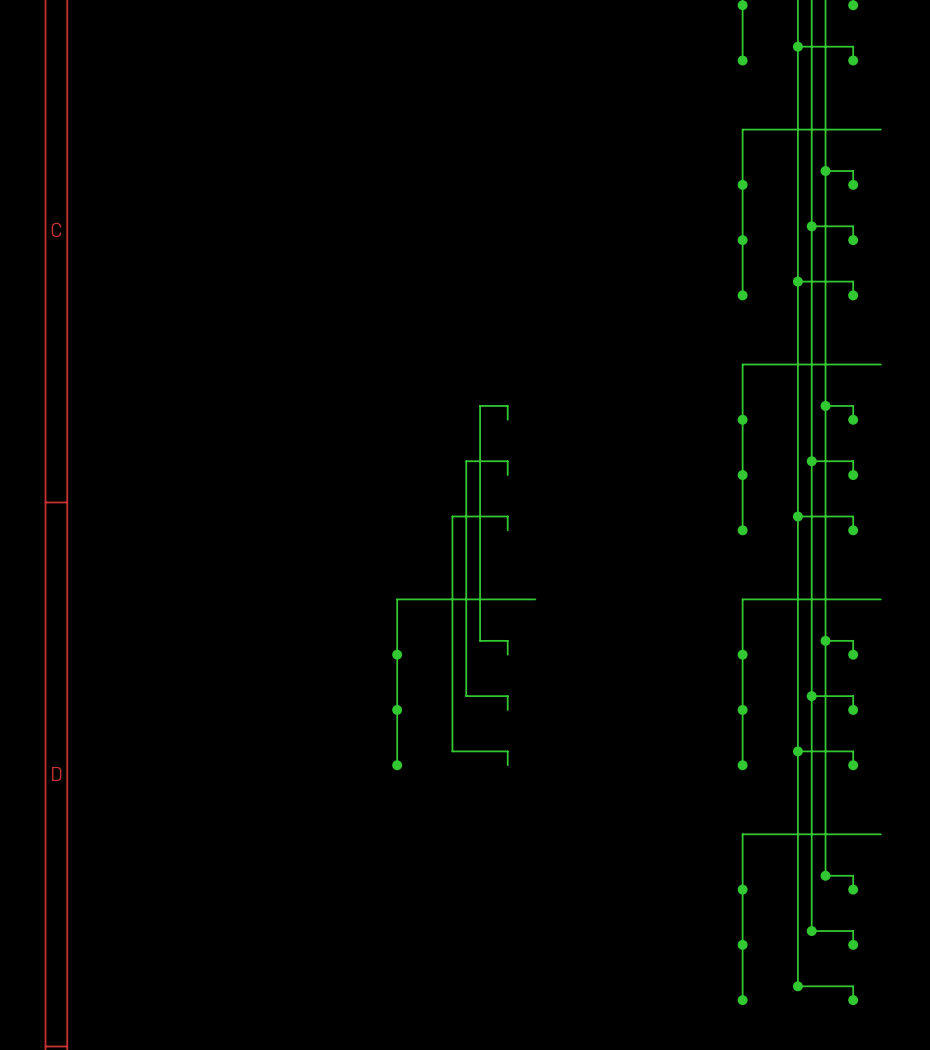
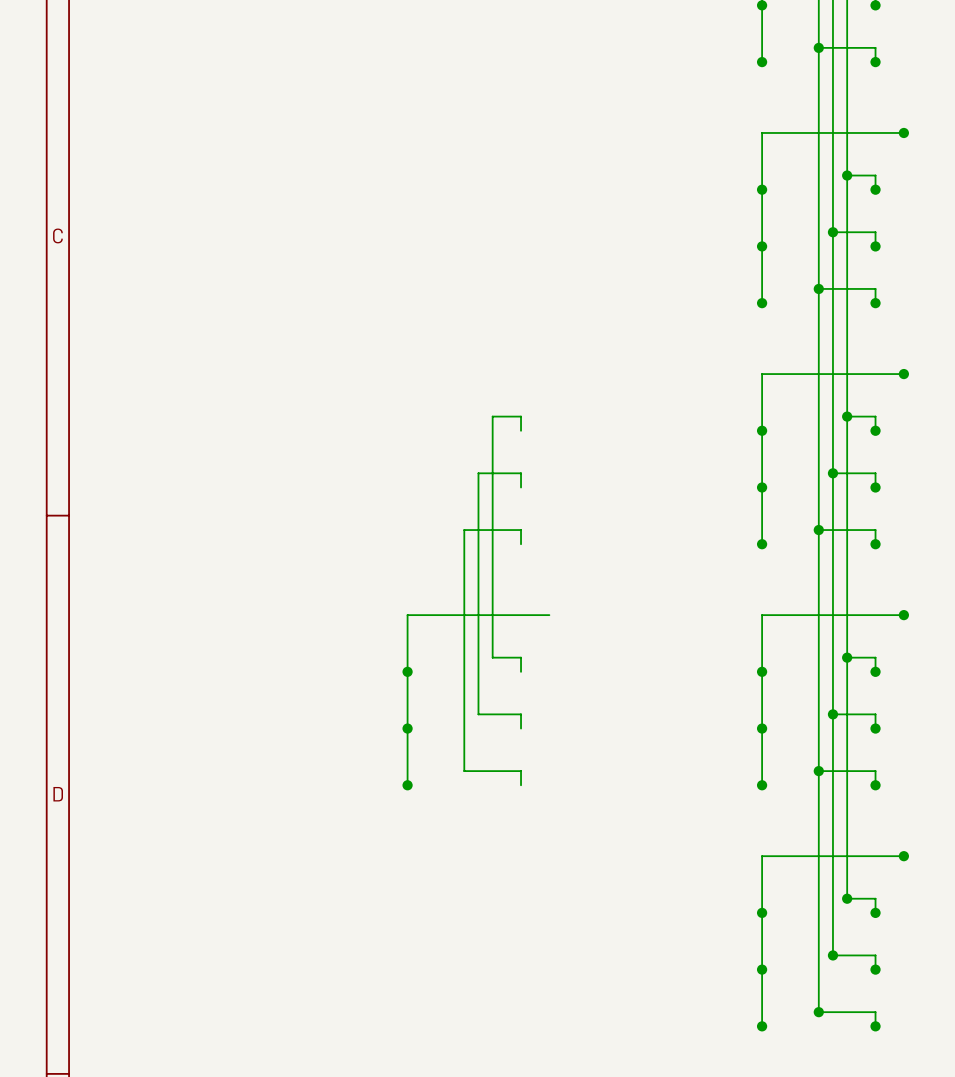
junction: none -> (903, 132)
junction: none -> (903, 374)
junction: none -> (903, 615)
junction: none -> (903, 856)

